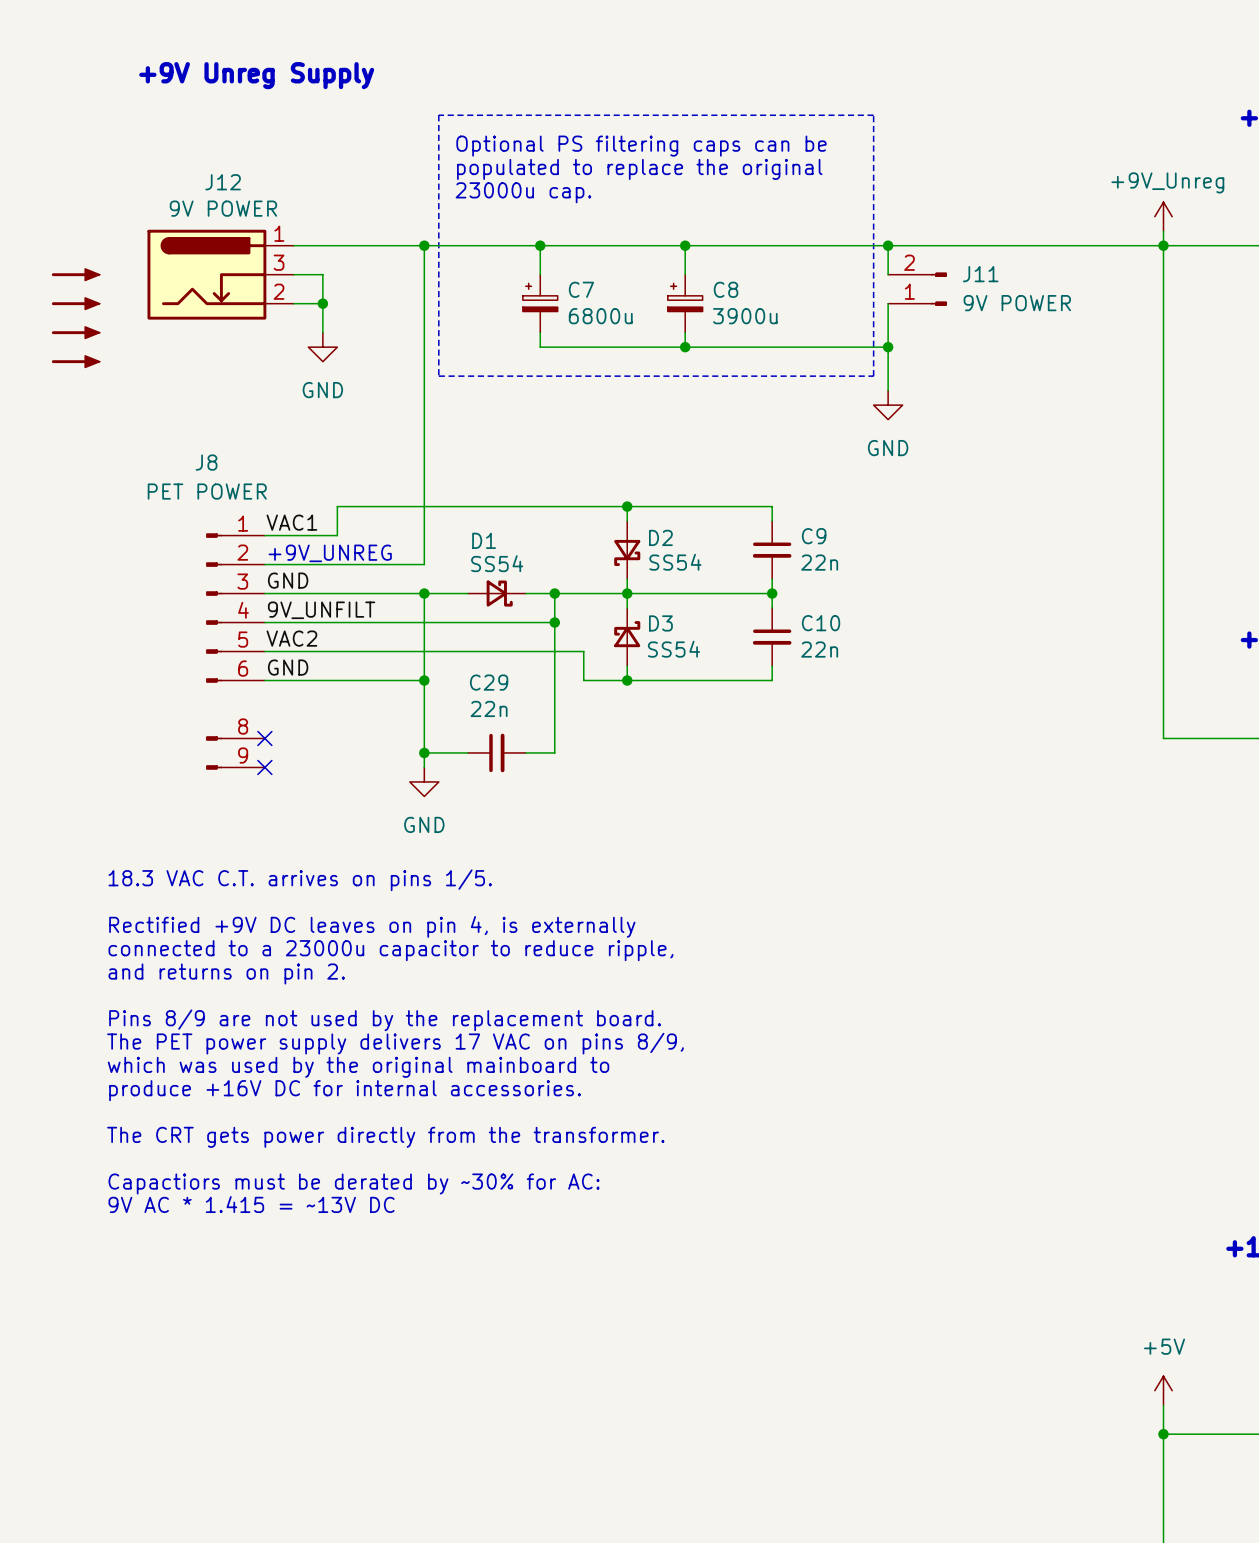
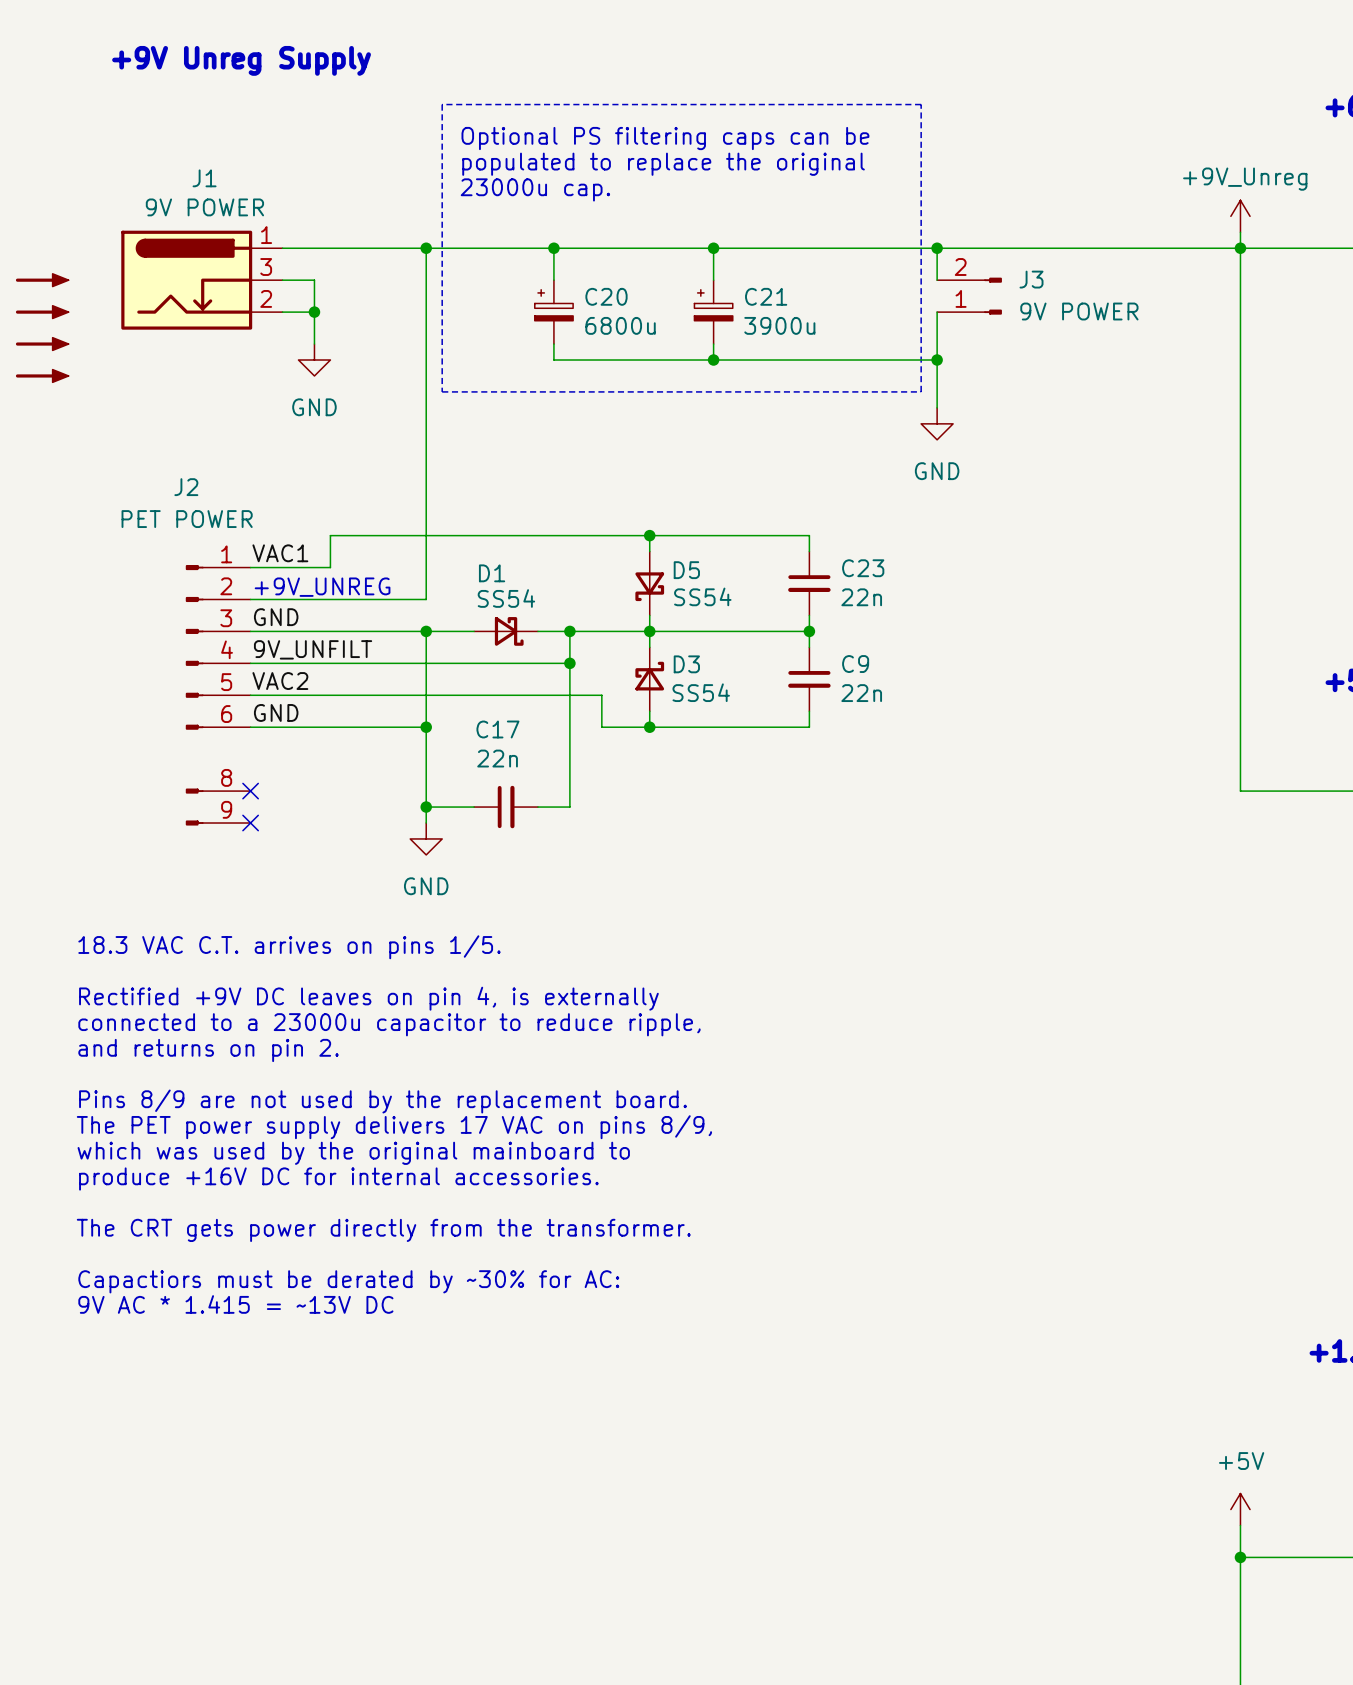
J12 name: J12 (223, 182) -> J1 (204, 178)
J11 name: J11 (980, 274) -> J3 (1031, 279)
C7 name: C7 (581, 289) -> C20 (606, 296)
C8 name: C8 (726, 289) -> C21 (766, 296)
J8 name: J8 (206, 462) -> J2 (186, 487)
C9 name: C9 (814, 536) -> C23 (863, 568)
D2 name: D2 (660, 537) -> D5 (686, 570)
C10 name: C10 (821, 623) -> C9 (855, 664)
C29 name: C29 (489, 682) -> C17 (497, 729)

